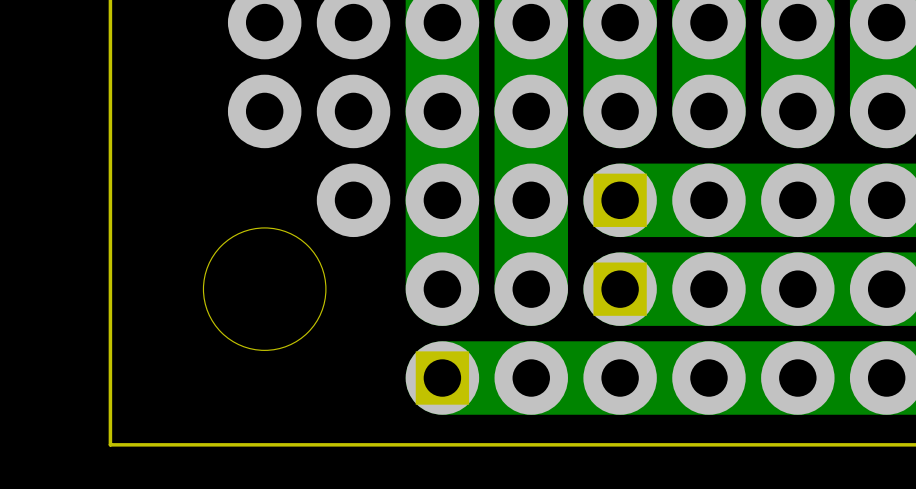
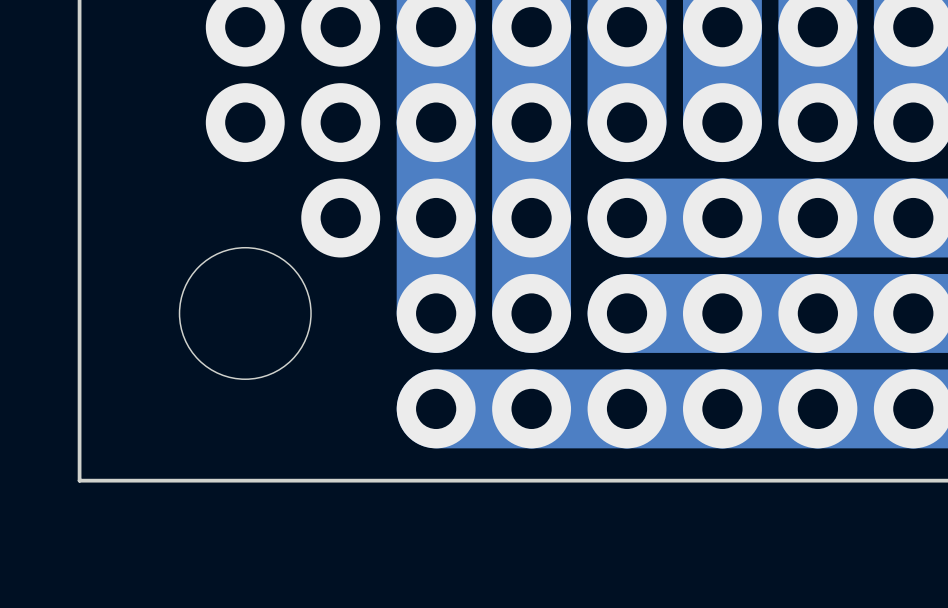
part: (620, 200) -> none
part: (620, 289) -> none
part: (442, 378) -> none

